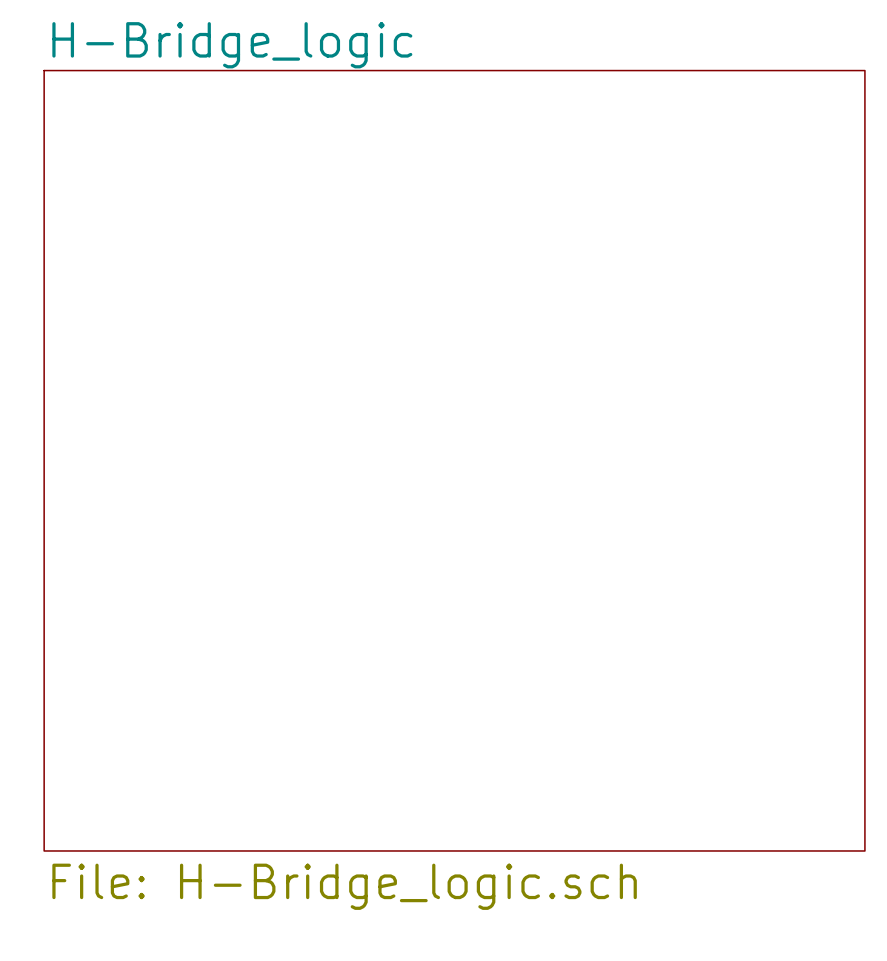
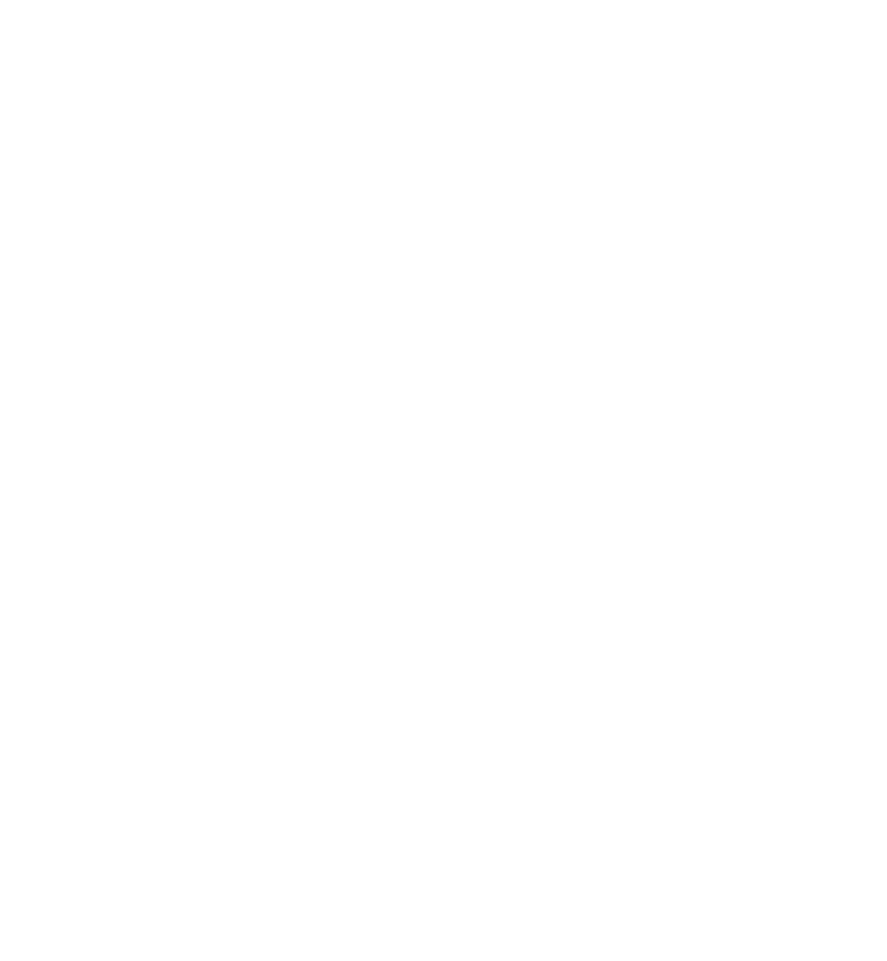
sheet H-Bridge_logic: File: H-Bridge_logic.sch (454, 460) -> none

